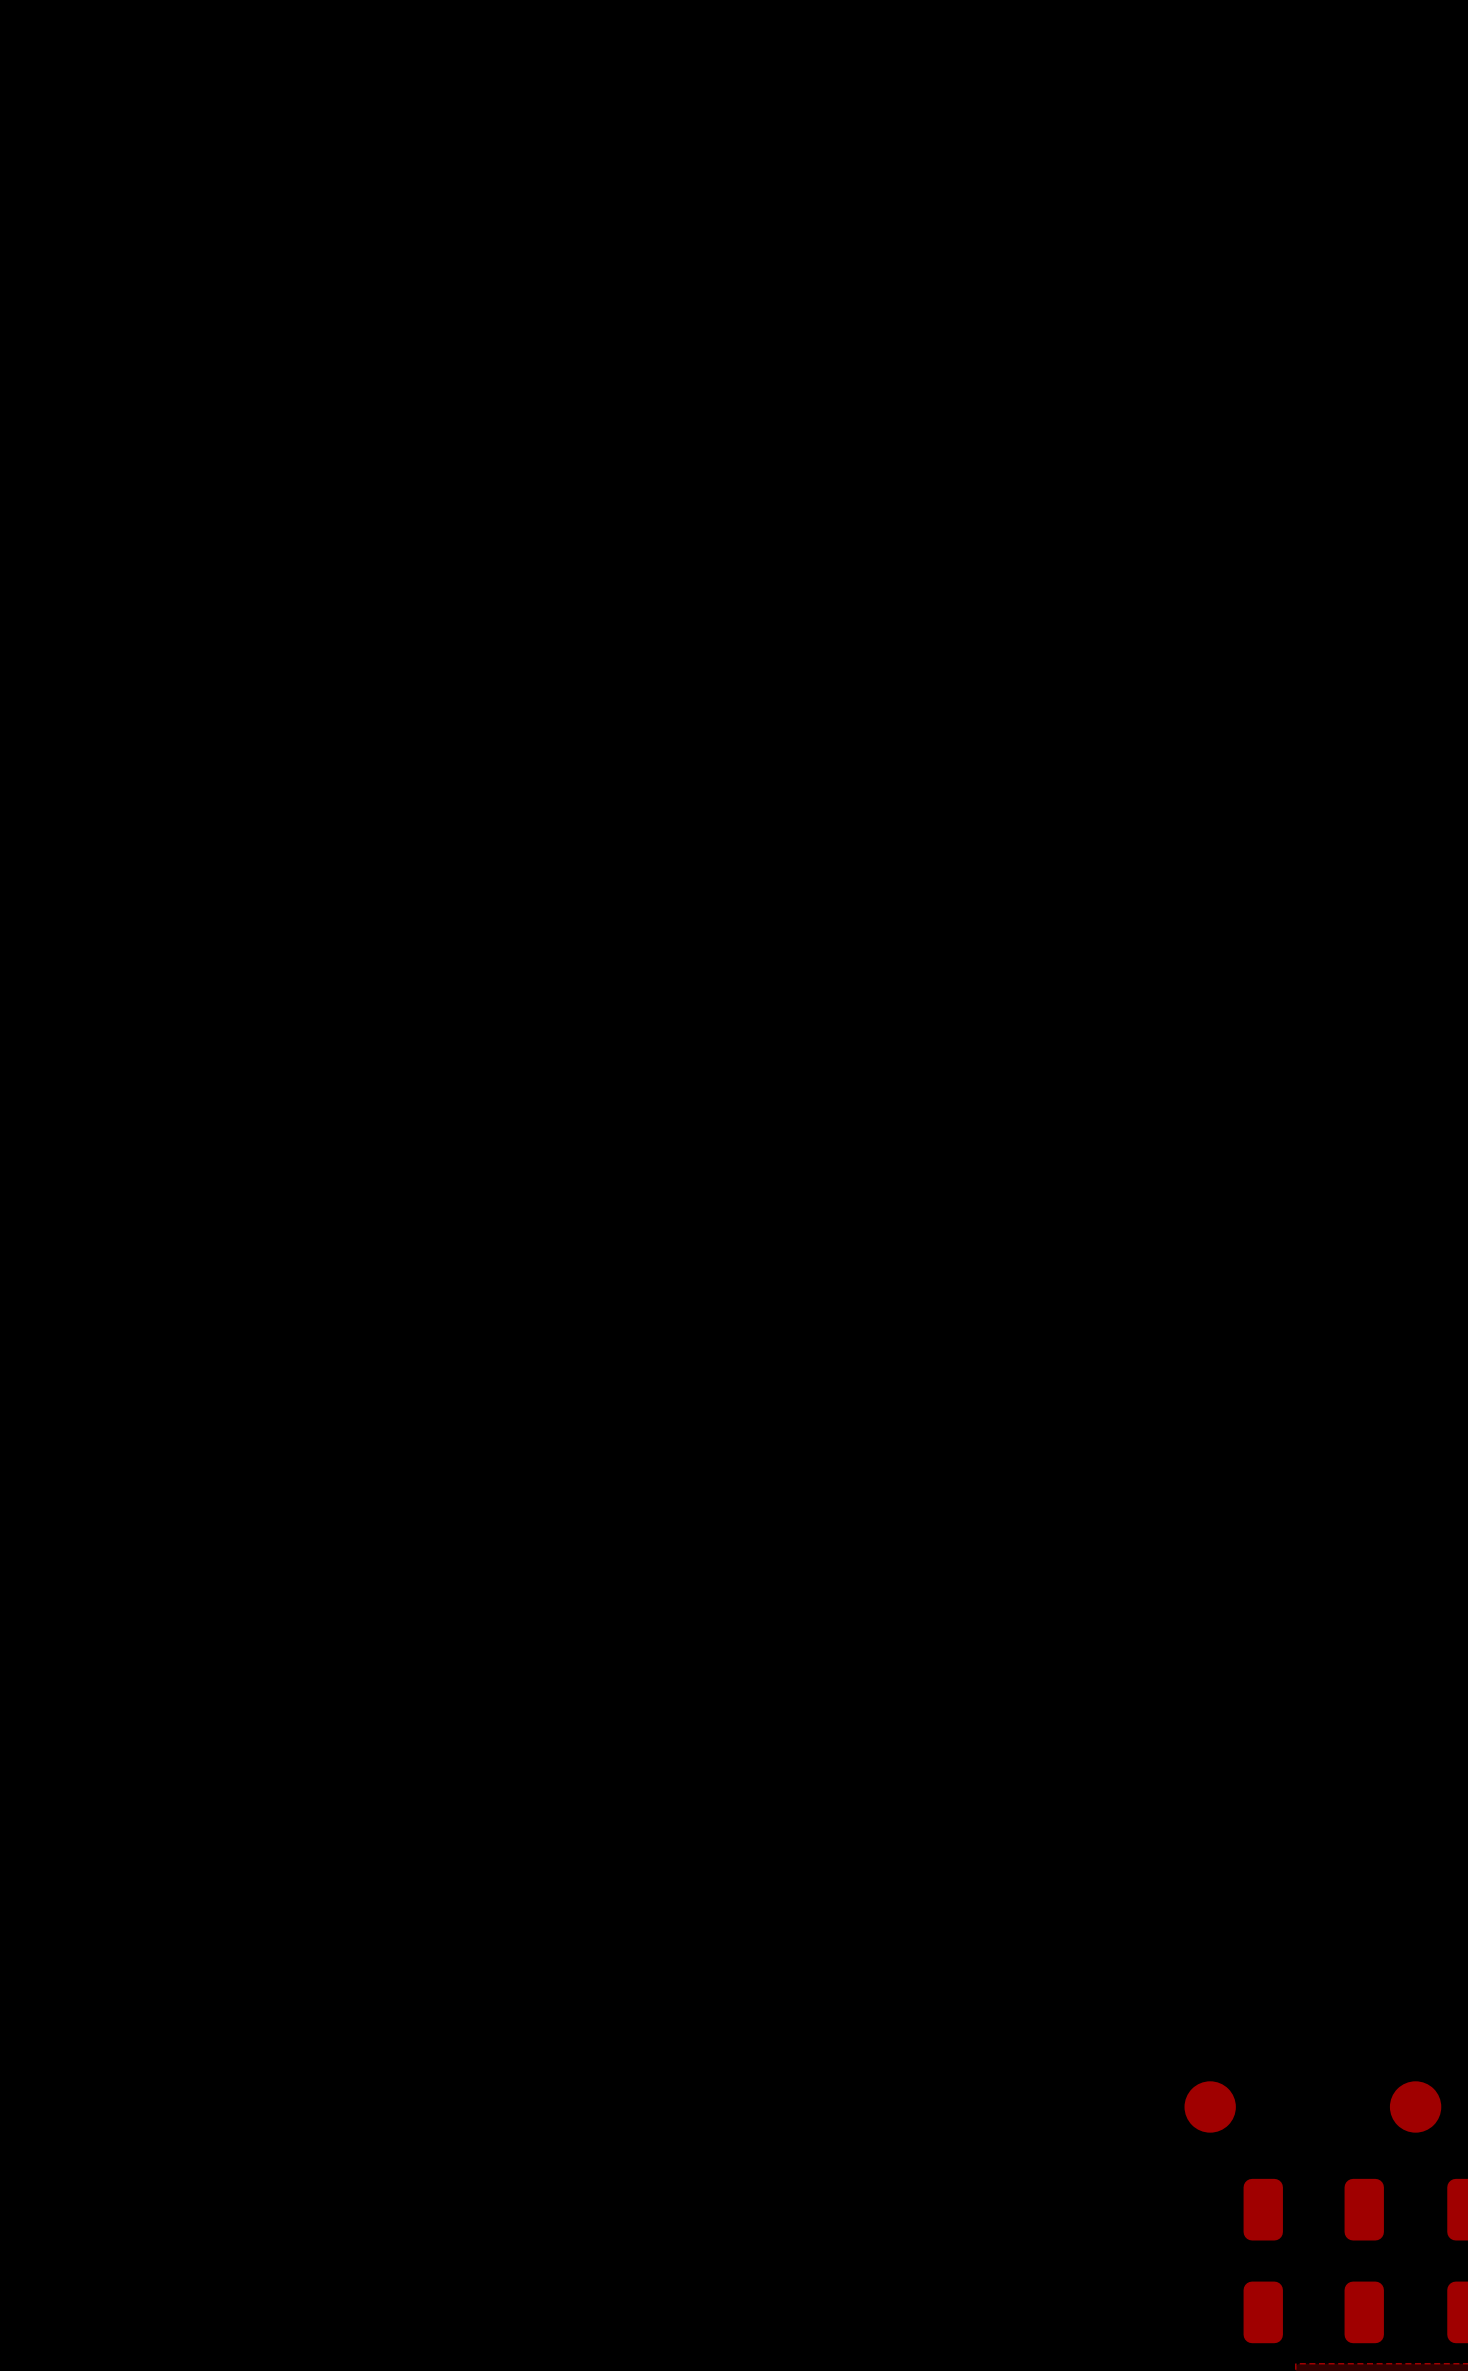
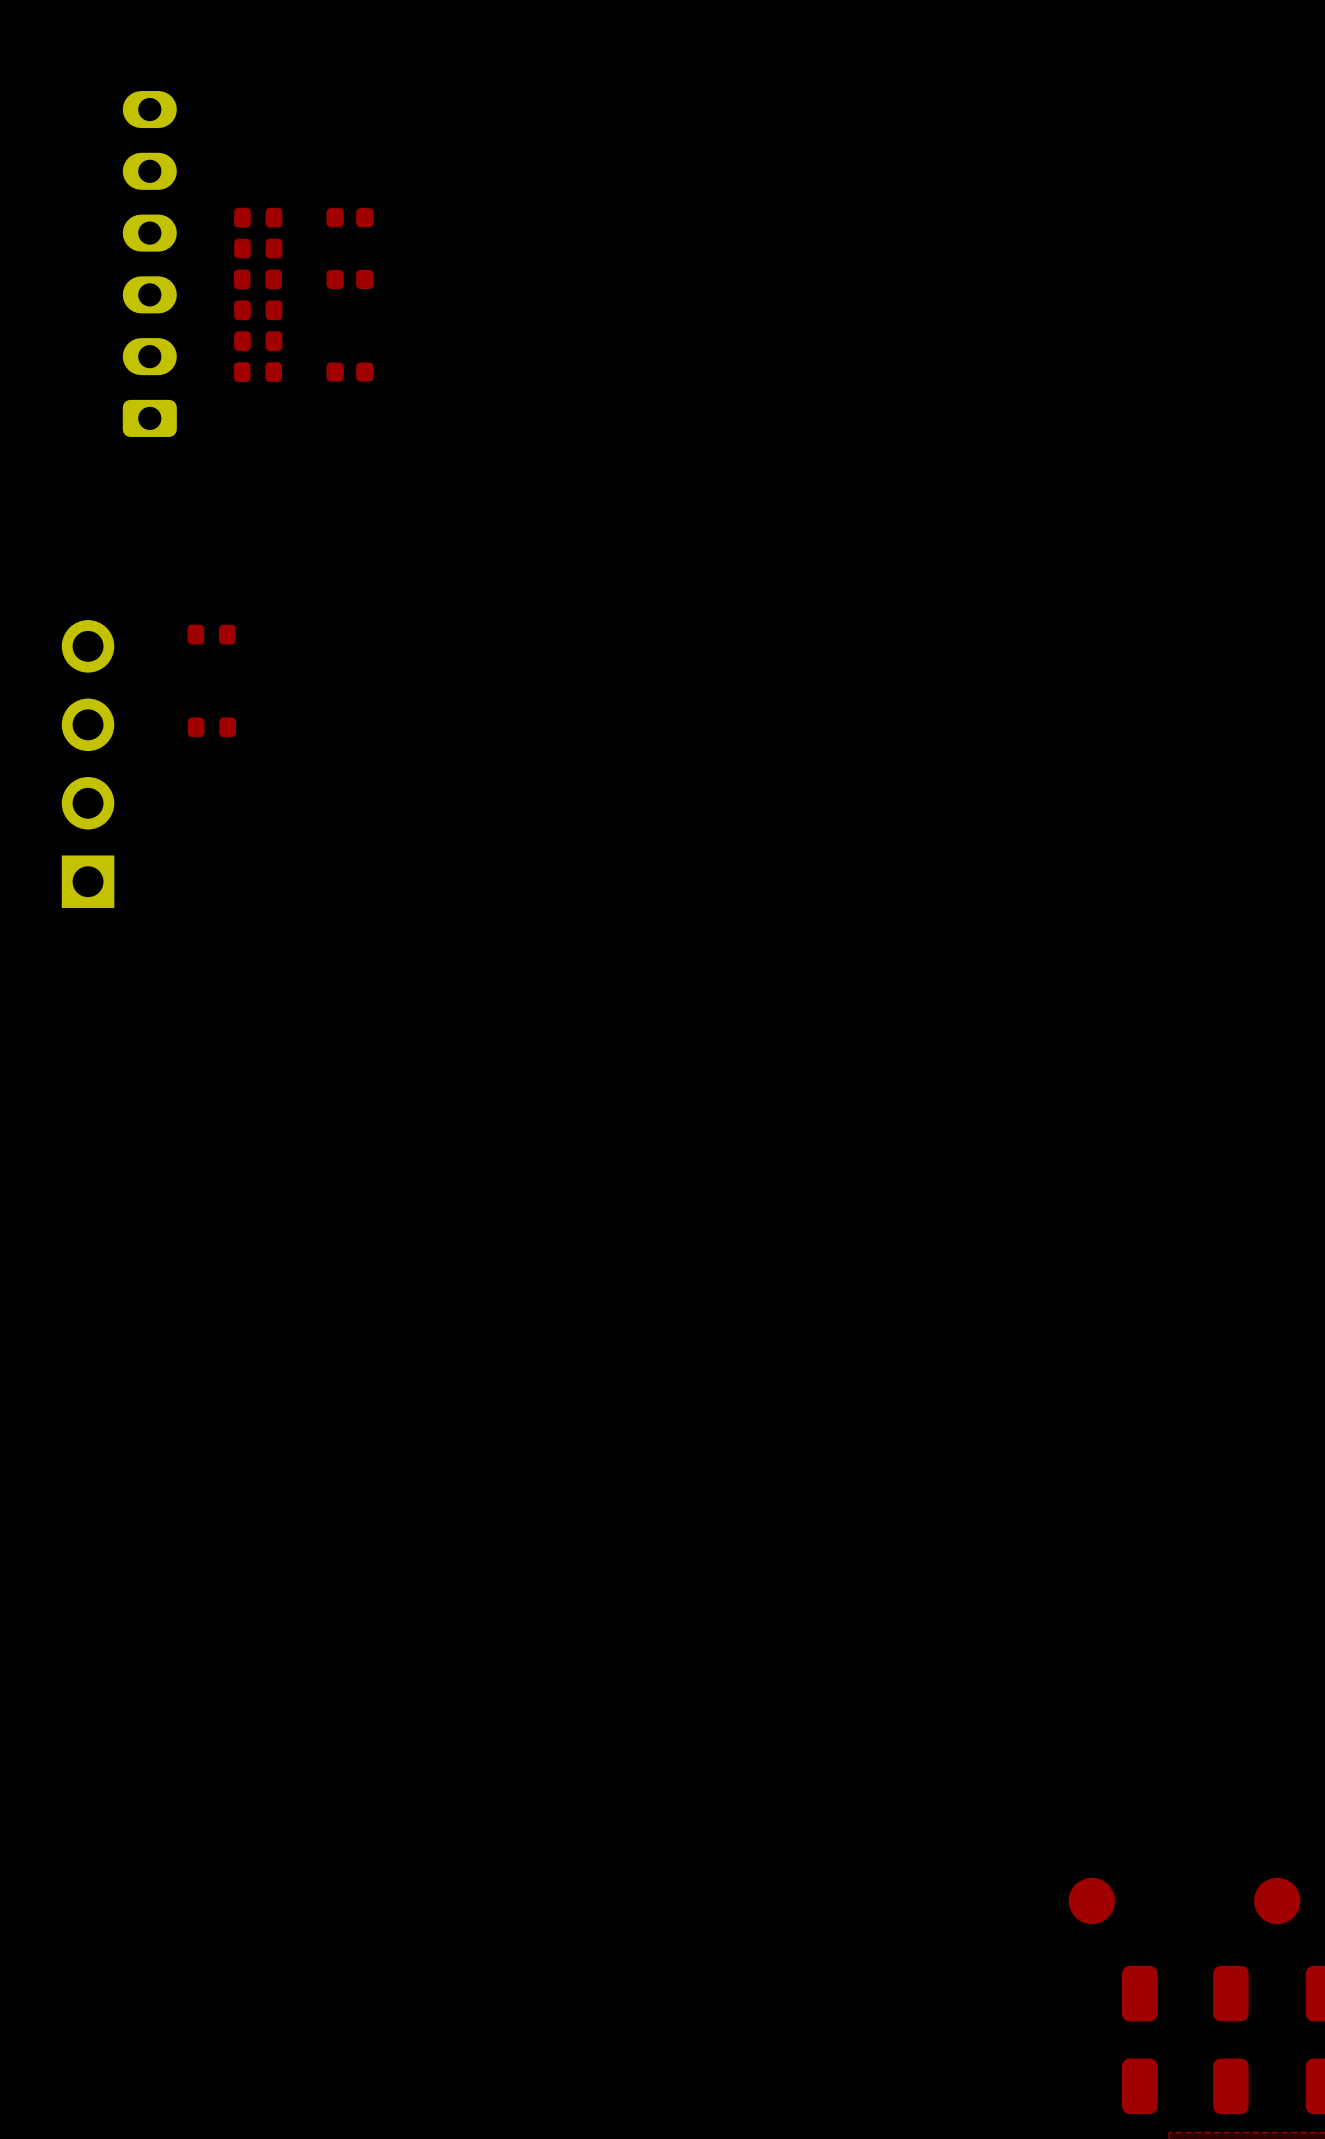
part: none -> (258, 217)
part: none -> (349, 217)
part: none -> (258, 248)
part: none -> (149, 263)
part: none -> (257, 279)
part: none -> (349, 279)
part: none -> (258, 310)
part: none -> (258, 341)
part: none -> (257, 372)
part: none -> (349, 372)
part: none -> (211, 634)
part: none -> (211, 727)
part: none -> (88, 764)

